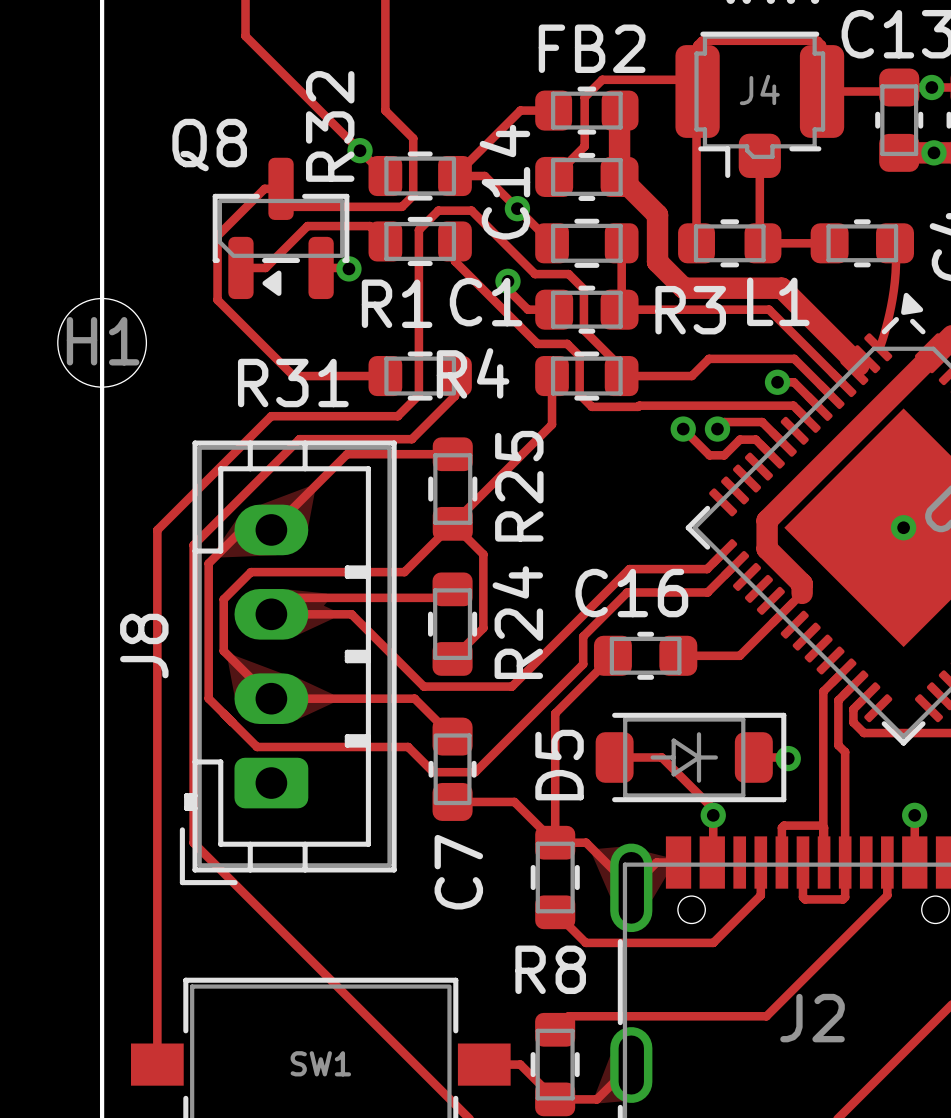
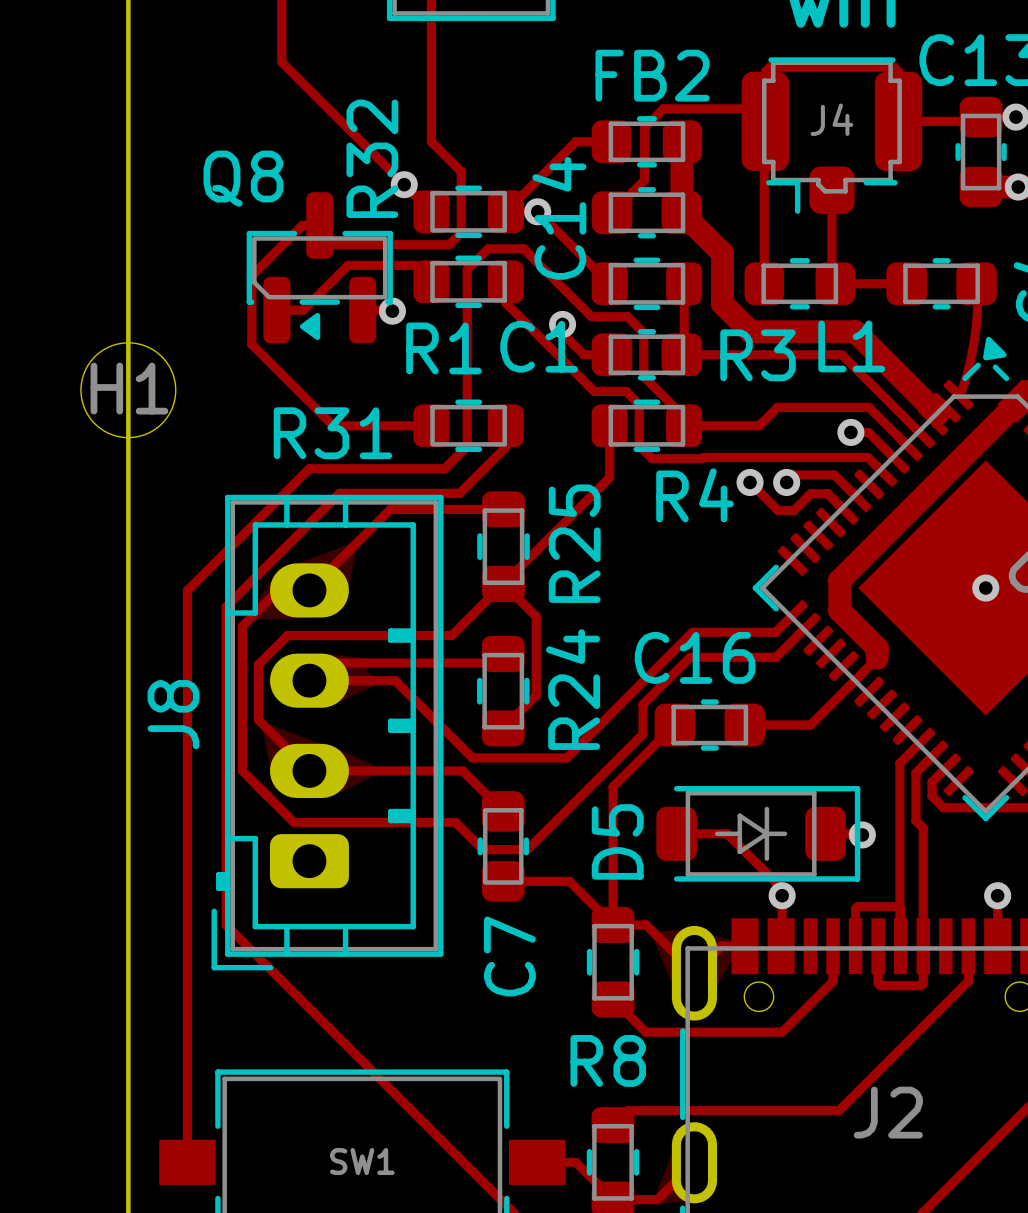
via position: (517, 208) -> (537, 211)
R4 name position: R4 (473, 373) -> R4 (695, 495)

